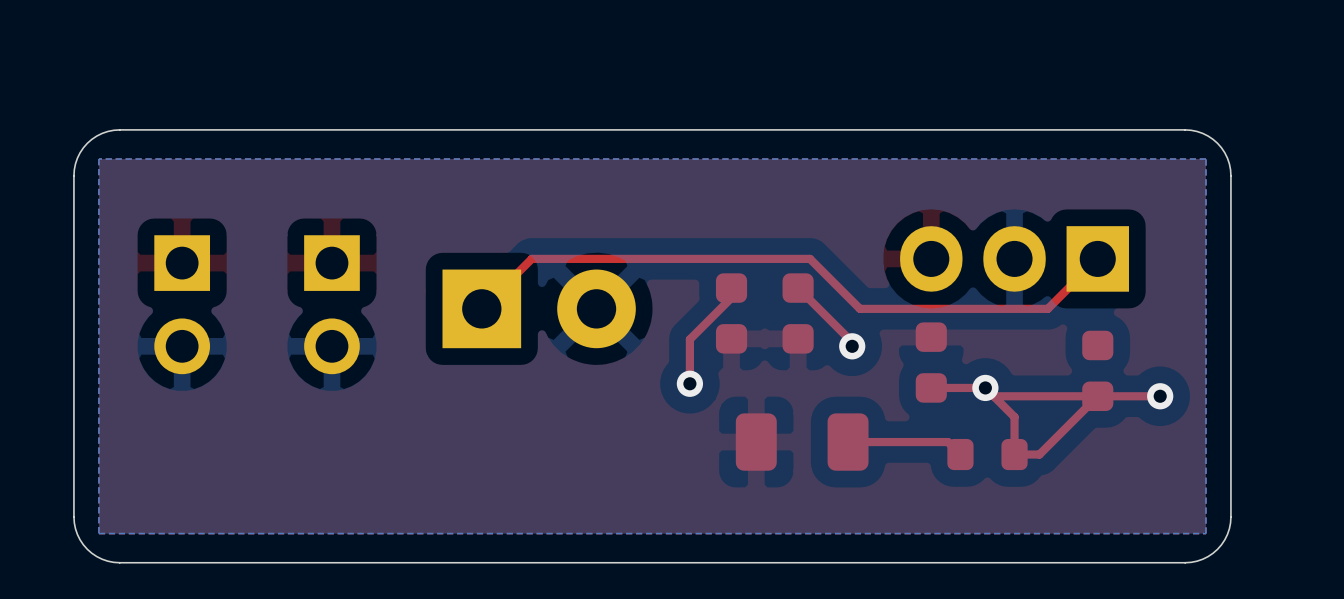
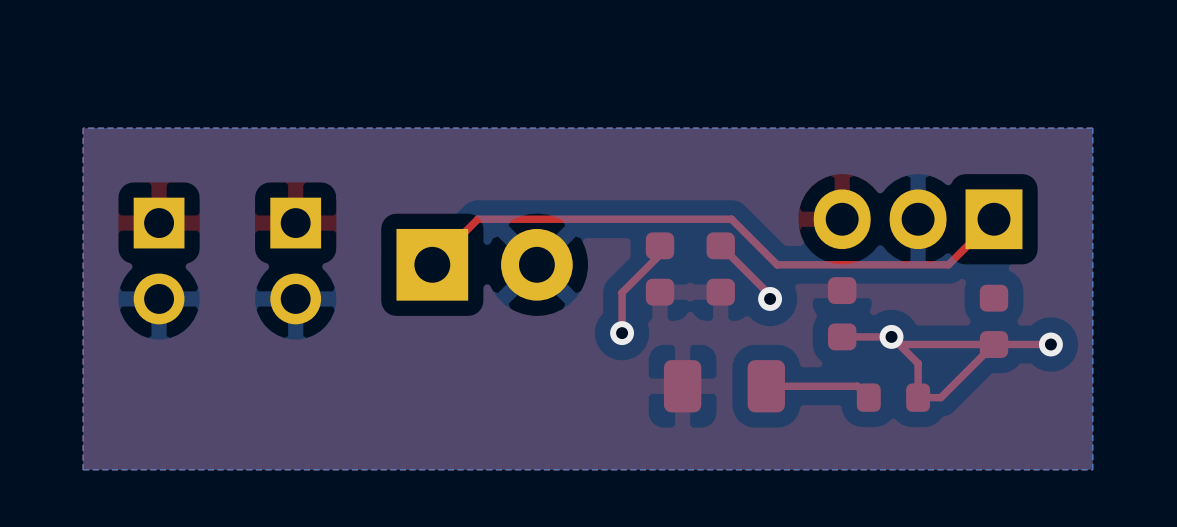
board edge: (1185, 129) (119, 129) (102, 133) (91, 139) (83, 147) (75, 163) (73, 175) (73, 516) (77, 534) (83, 544) (91, 553) (102, 559) (119, 562) (1185, 562) (1202, 559) (1213, 553) (1221, 544) (1227, 534) (1230, 522) (1230, 175) (1227, 158) (1217, 143) (1202, 133) (1185, 129) -> none

